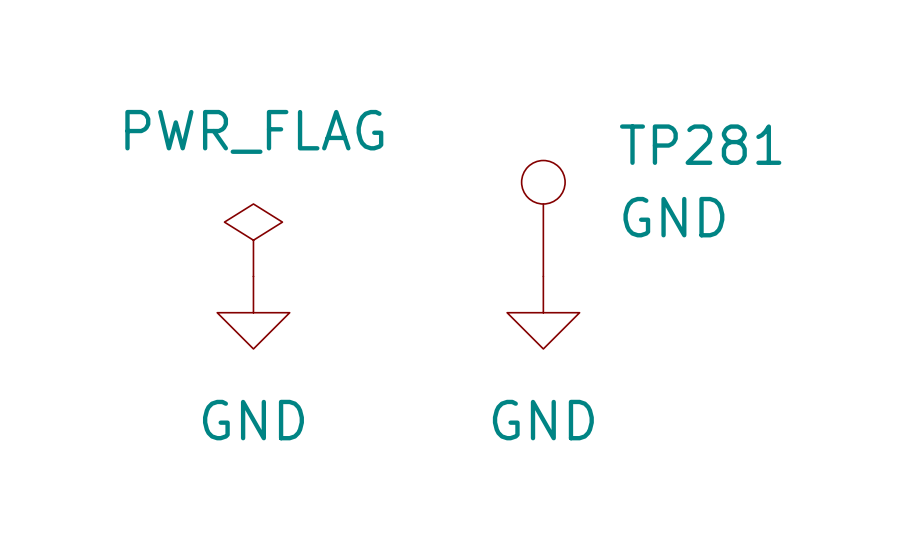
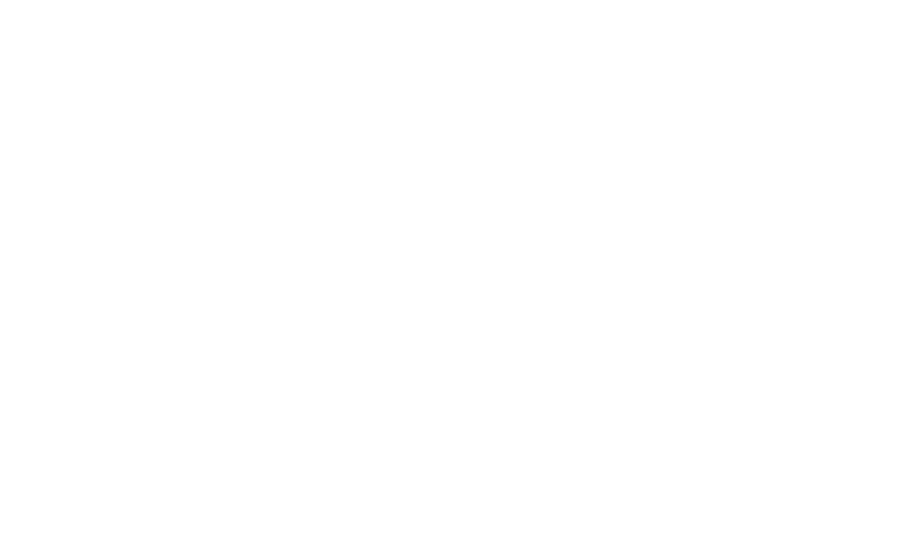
TP281: GND (543, 218) -> none
power symbol: PWR_FLAG (253, 240) -> none
power symbol: GND (253, 312) -> none
power symbol: GND (543, 312) -> none

